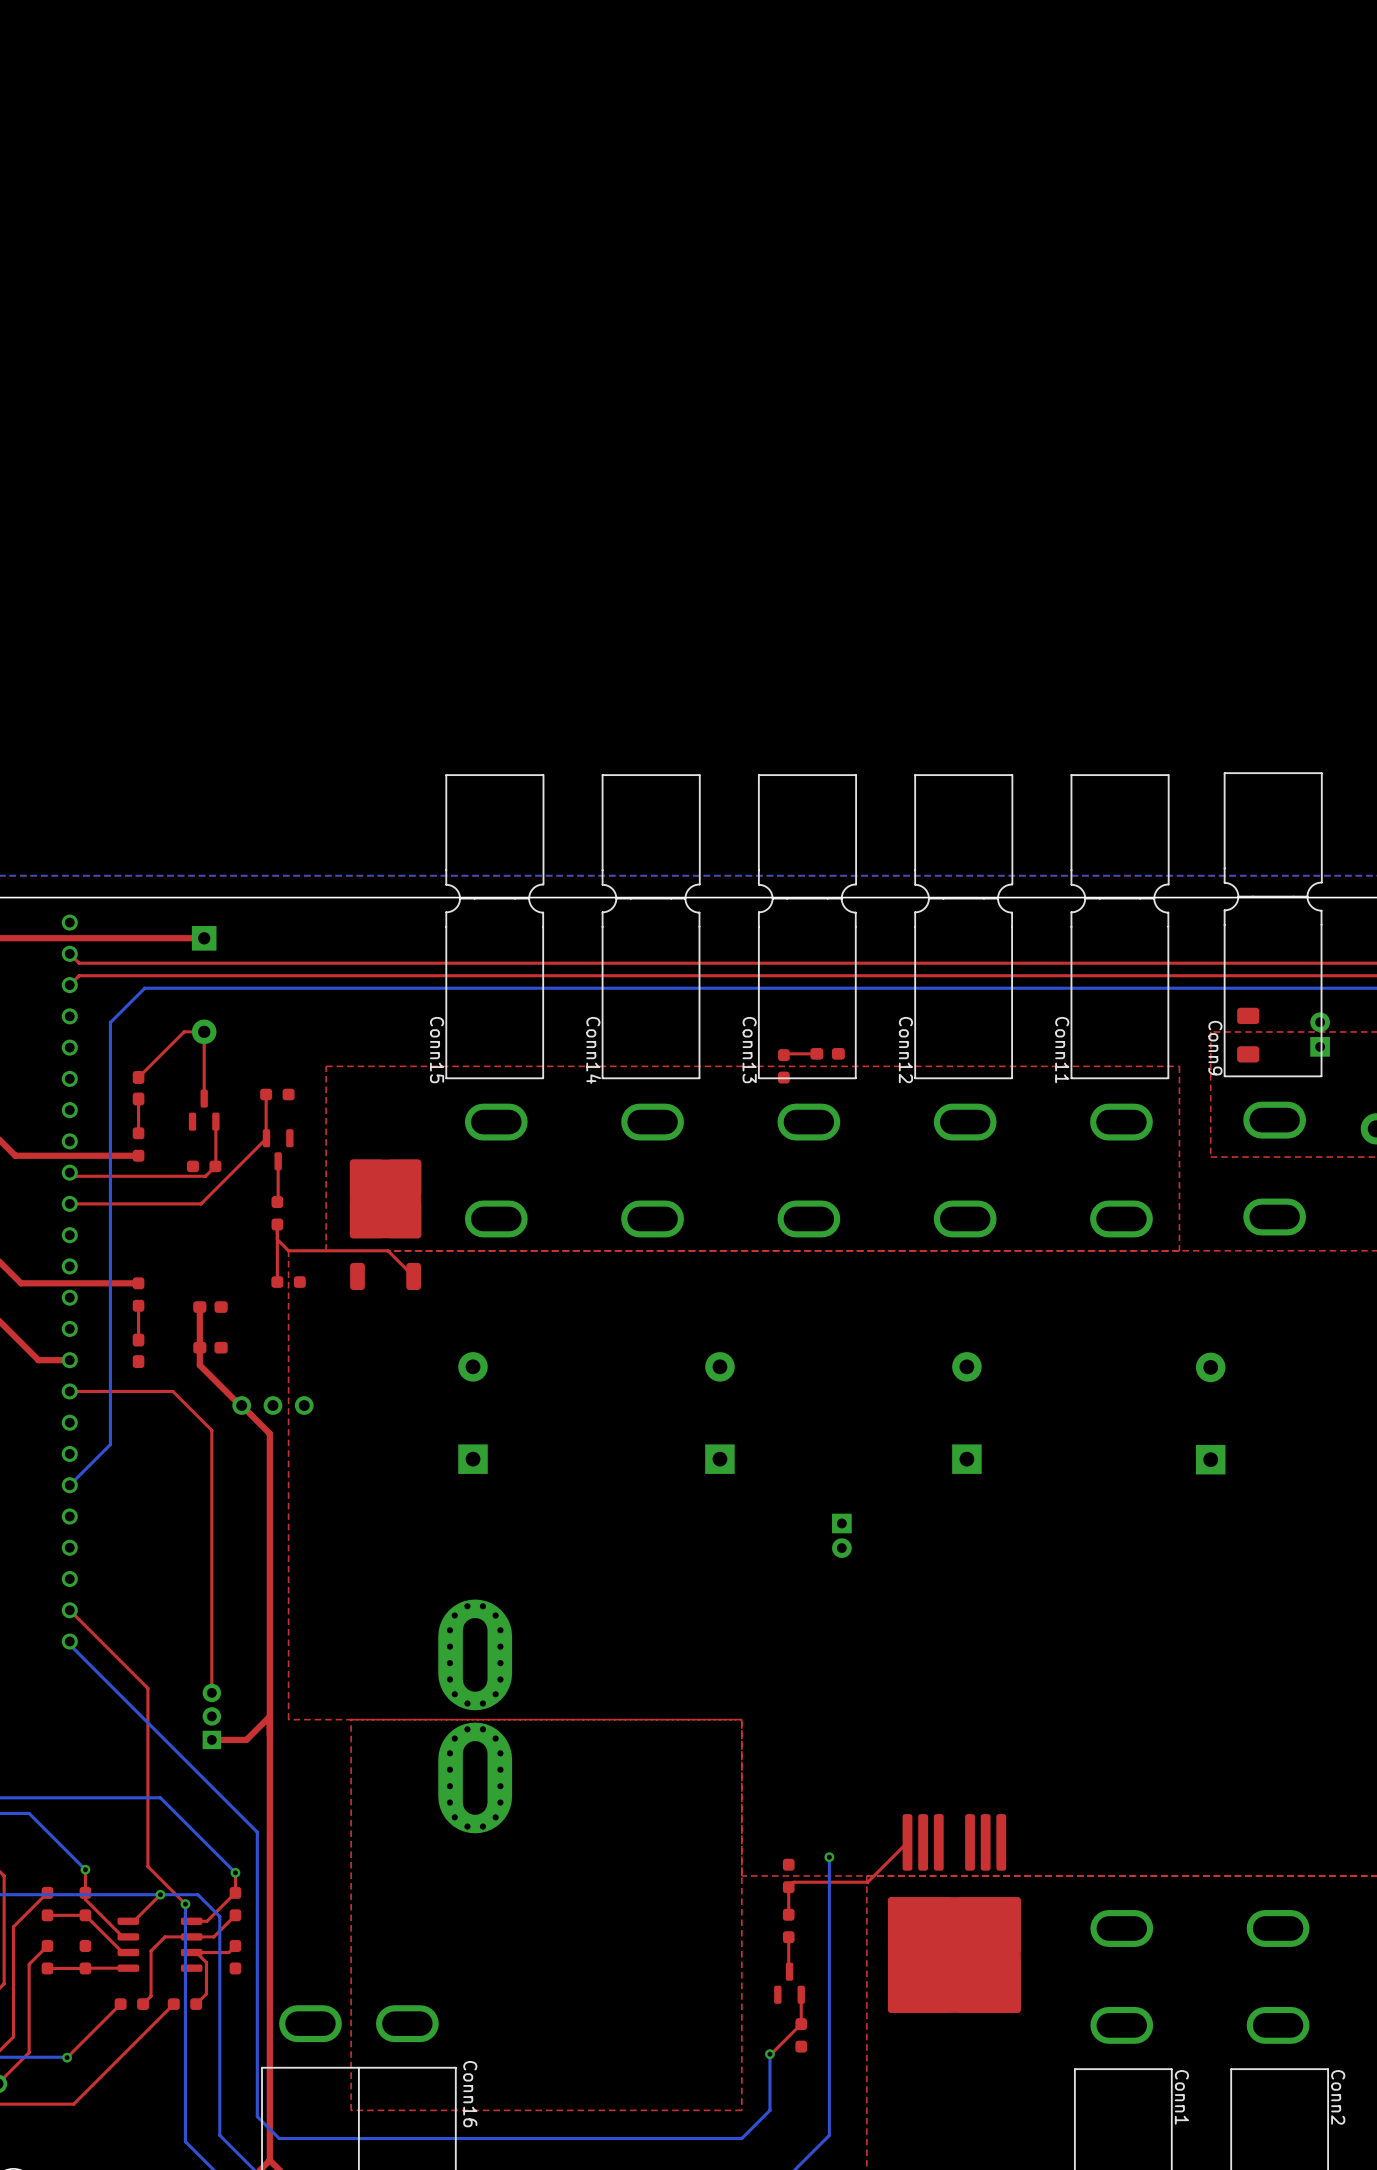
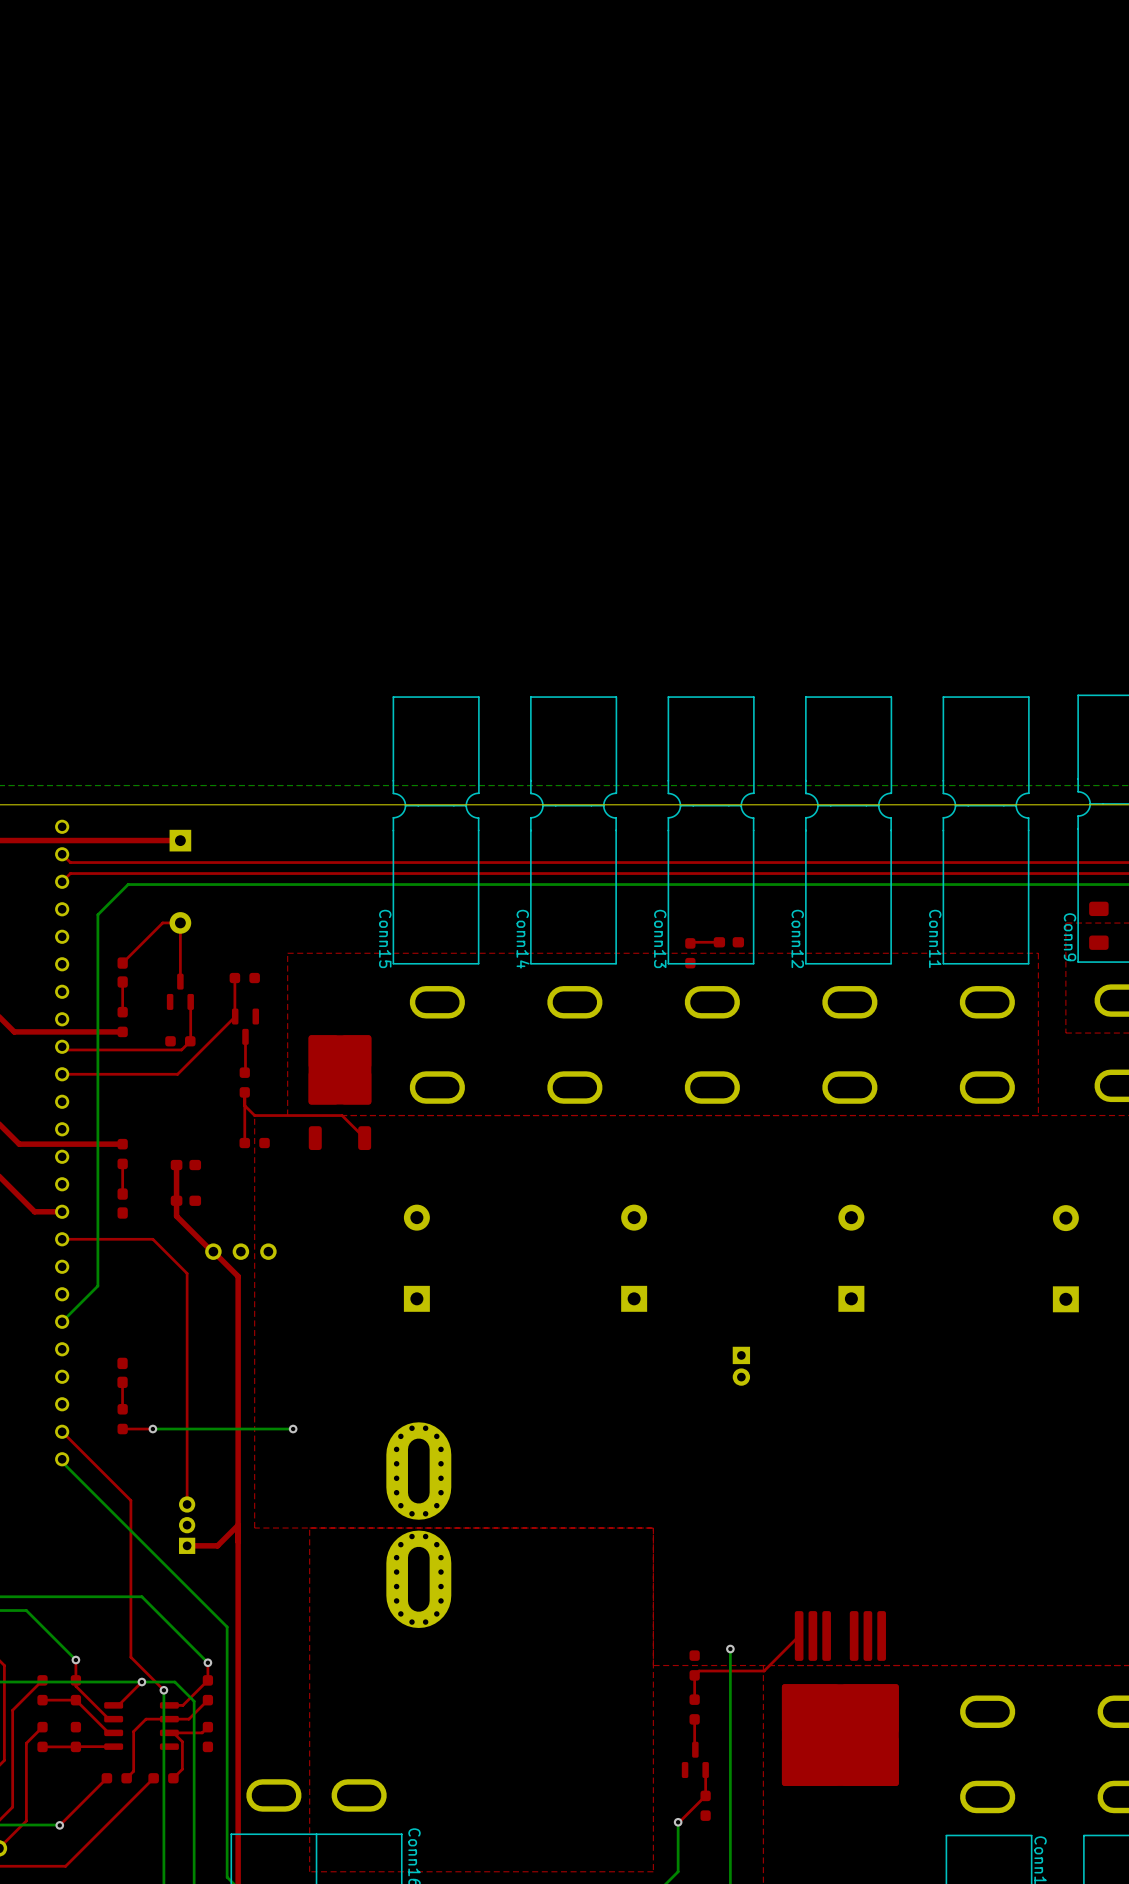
part: none -> (122, 1372)
top track: none -> (122, 1382) (122, 1409)
part: none -> (122, 1419)
top track: none -> (152, 1429) (122, 1429)
via: none -> (152, 1429)
bottom track: none -> (293, 1429) (152, 1429)
via: none -> (293, 1429)

